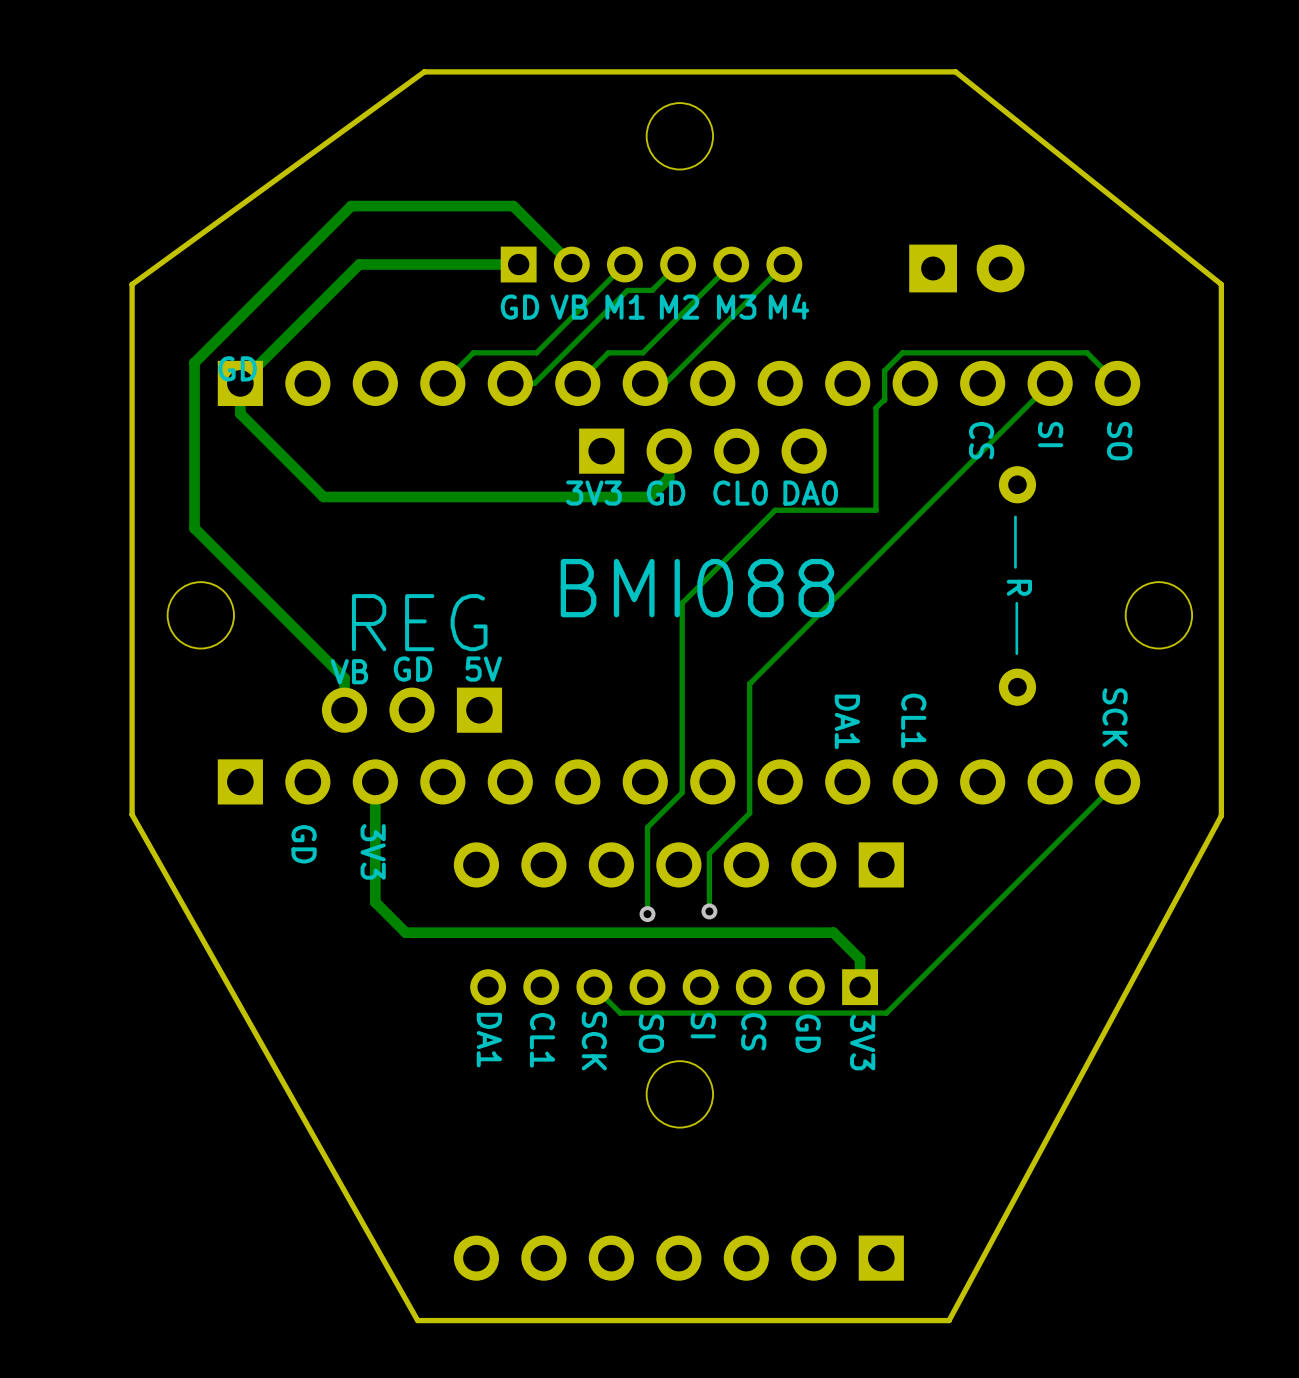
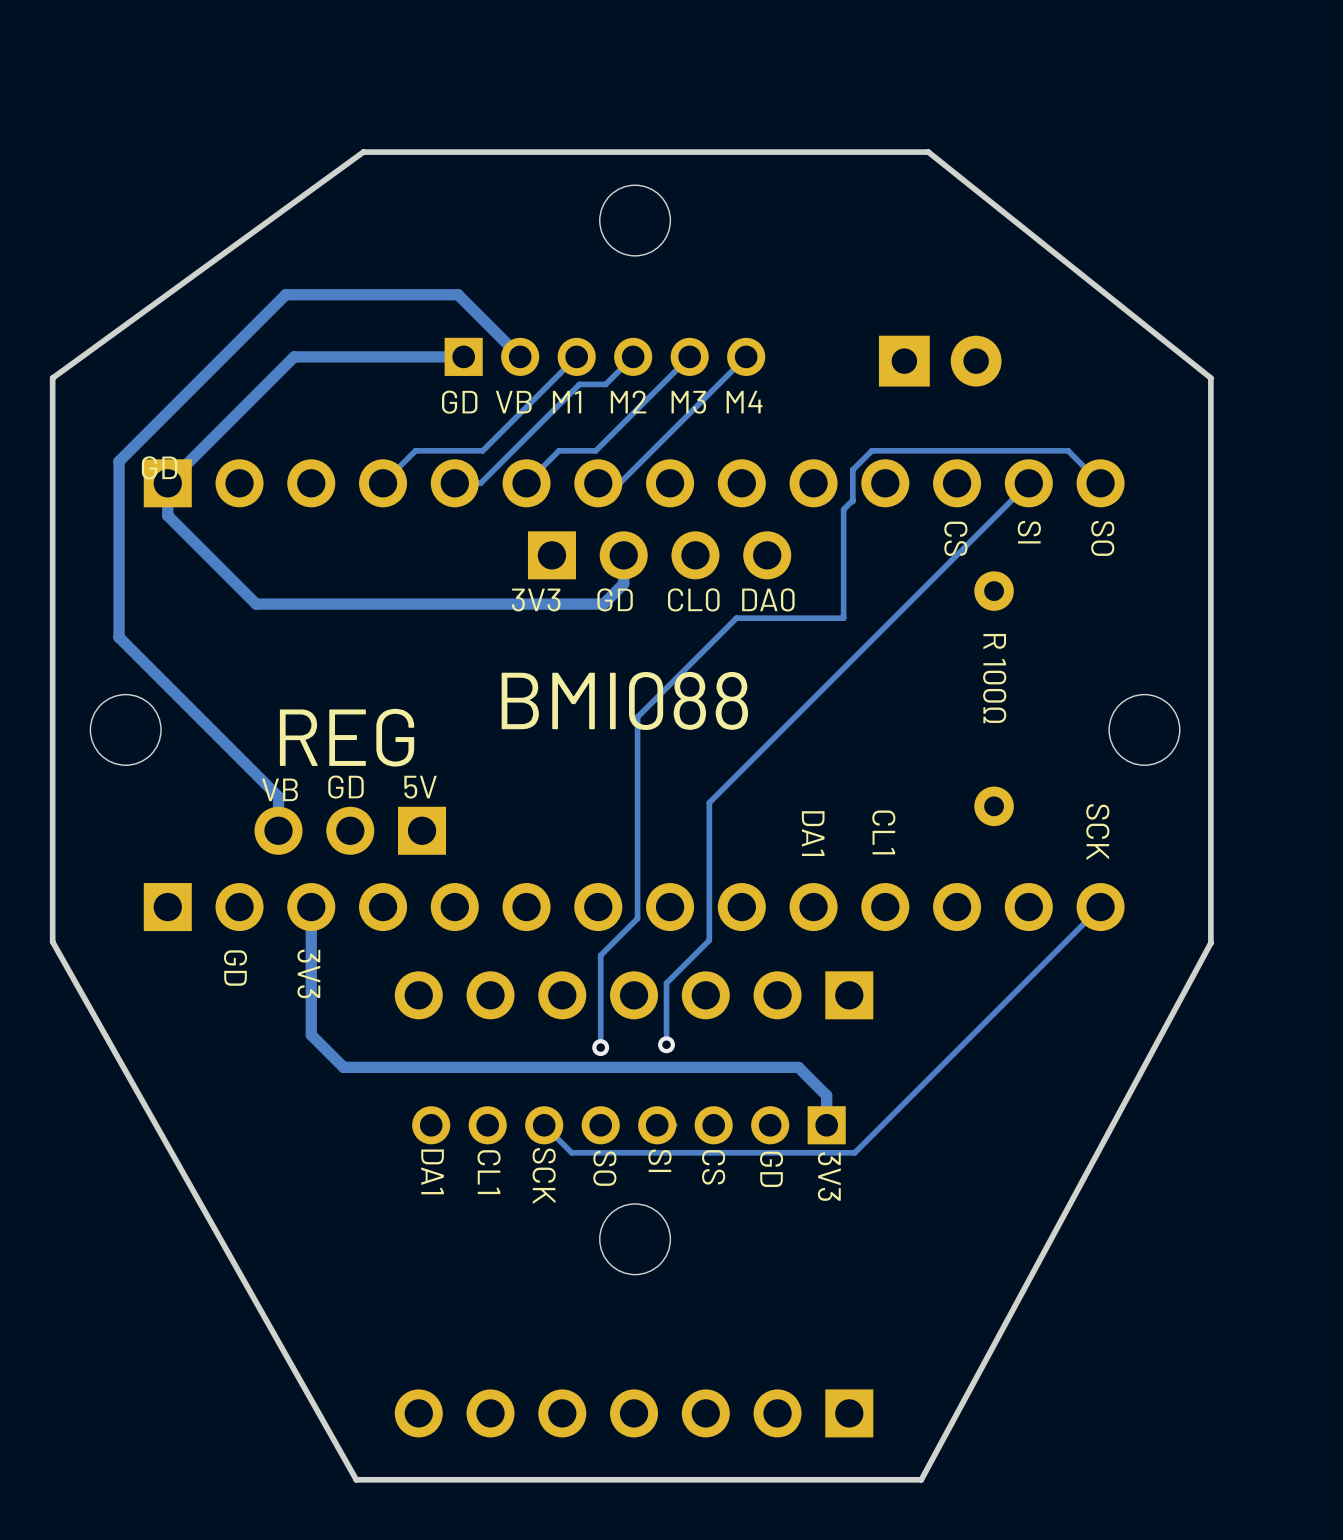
line: (1015, 516) (1015, 567) -> none
text: none -> R 100Ω (994, 678)
text: R (1019, 587) -> none
line: (1016, 603) (1016, 653) -> none

